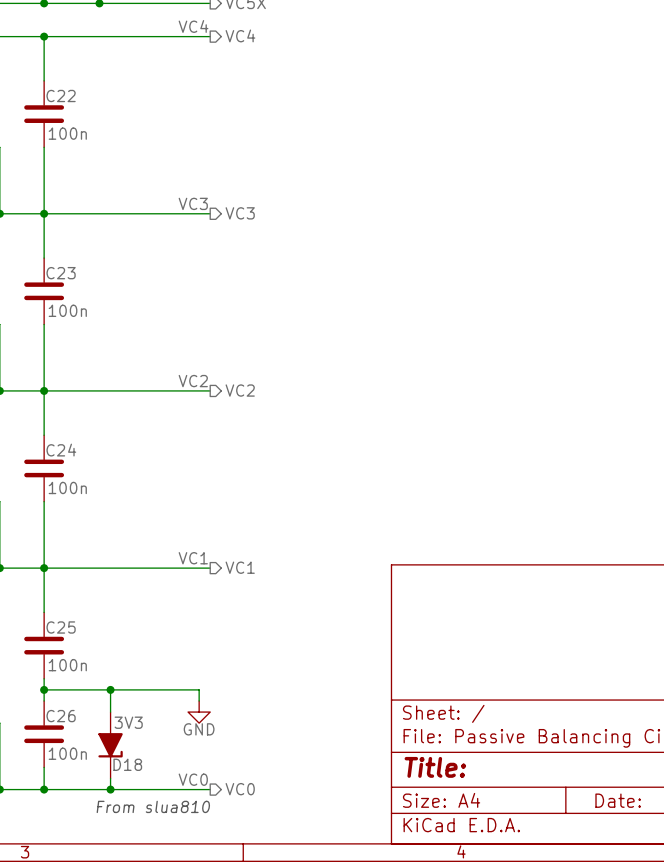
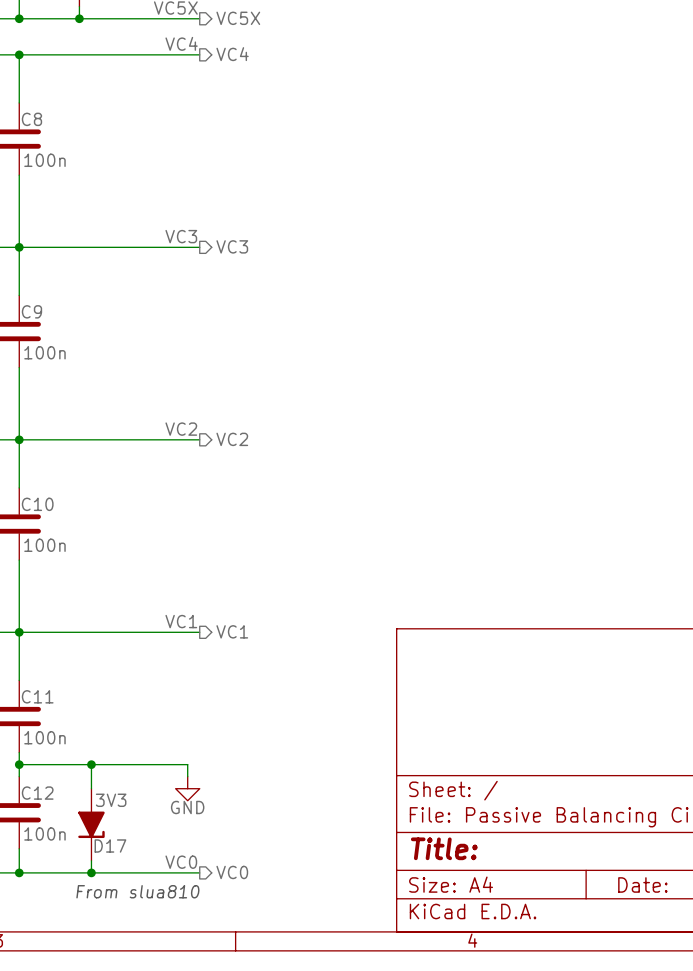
C22 name: C22 (61, 95) -> C8 (31, 119)
C23 name: C23 (61, 273) -> C9 (31, 311)
C24 name: C24 (61, 450) -> C10 (37, 504)
C25 name: C25 (61, 627) -> C11 (37, 696)
C26 name: C26 (61, 716) -> C12 (37, 793)
D18 name: D18 (127, 764) -> D17 (110, 846)

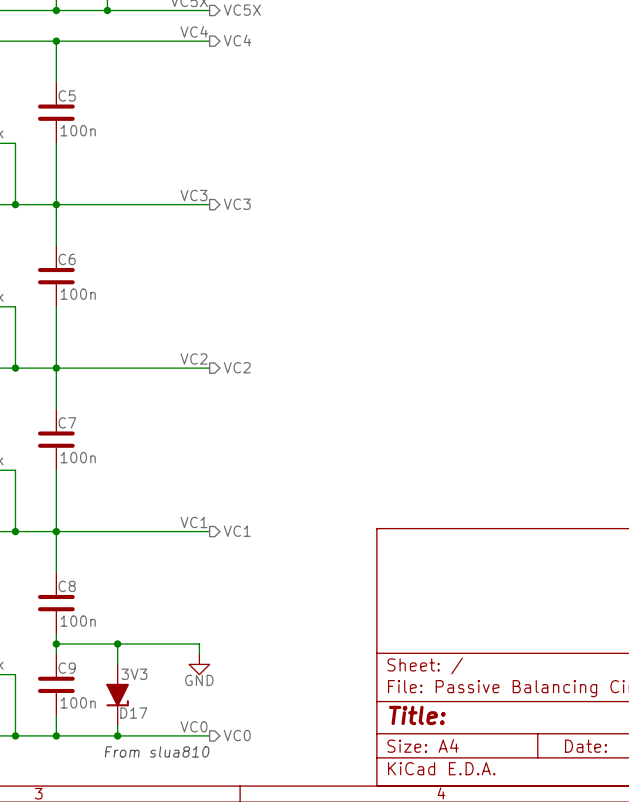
C8 name: C8 (31, 119) -> C5 (67, 95)
C9 name: C9 (31, 311) -> C6 (67, 259)
C10 name: C10 (37, 504) -> C7 (67, 422)
C11 name: C11 (37, 696) -> C8 (67, 586)
C12 name: C12 (37, 793) -> C9 (67, 668)

